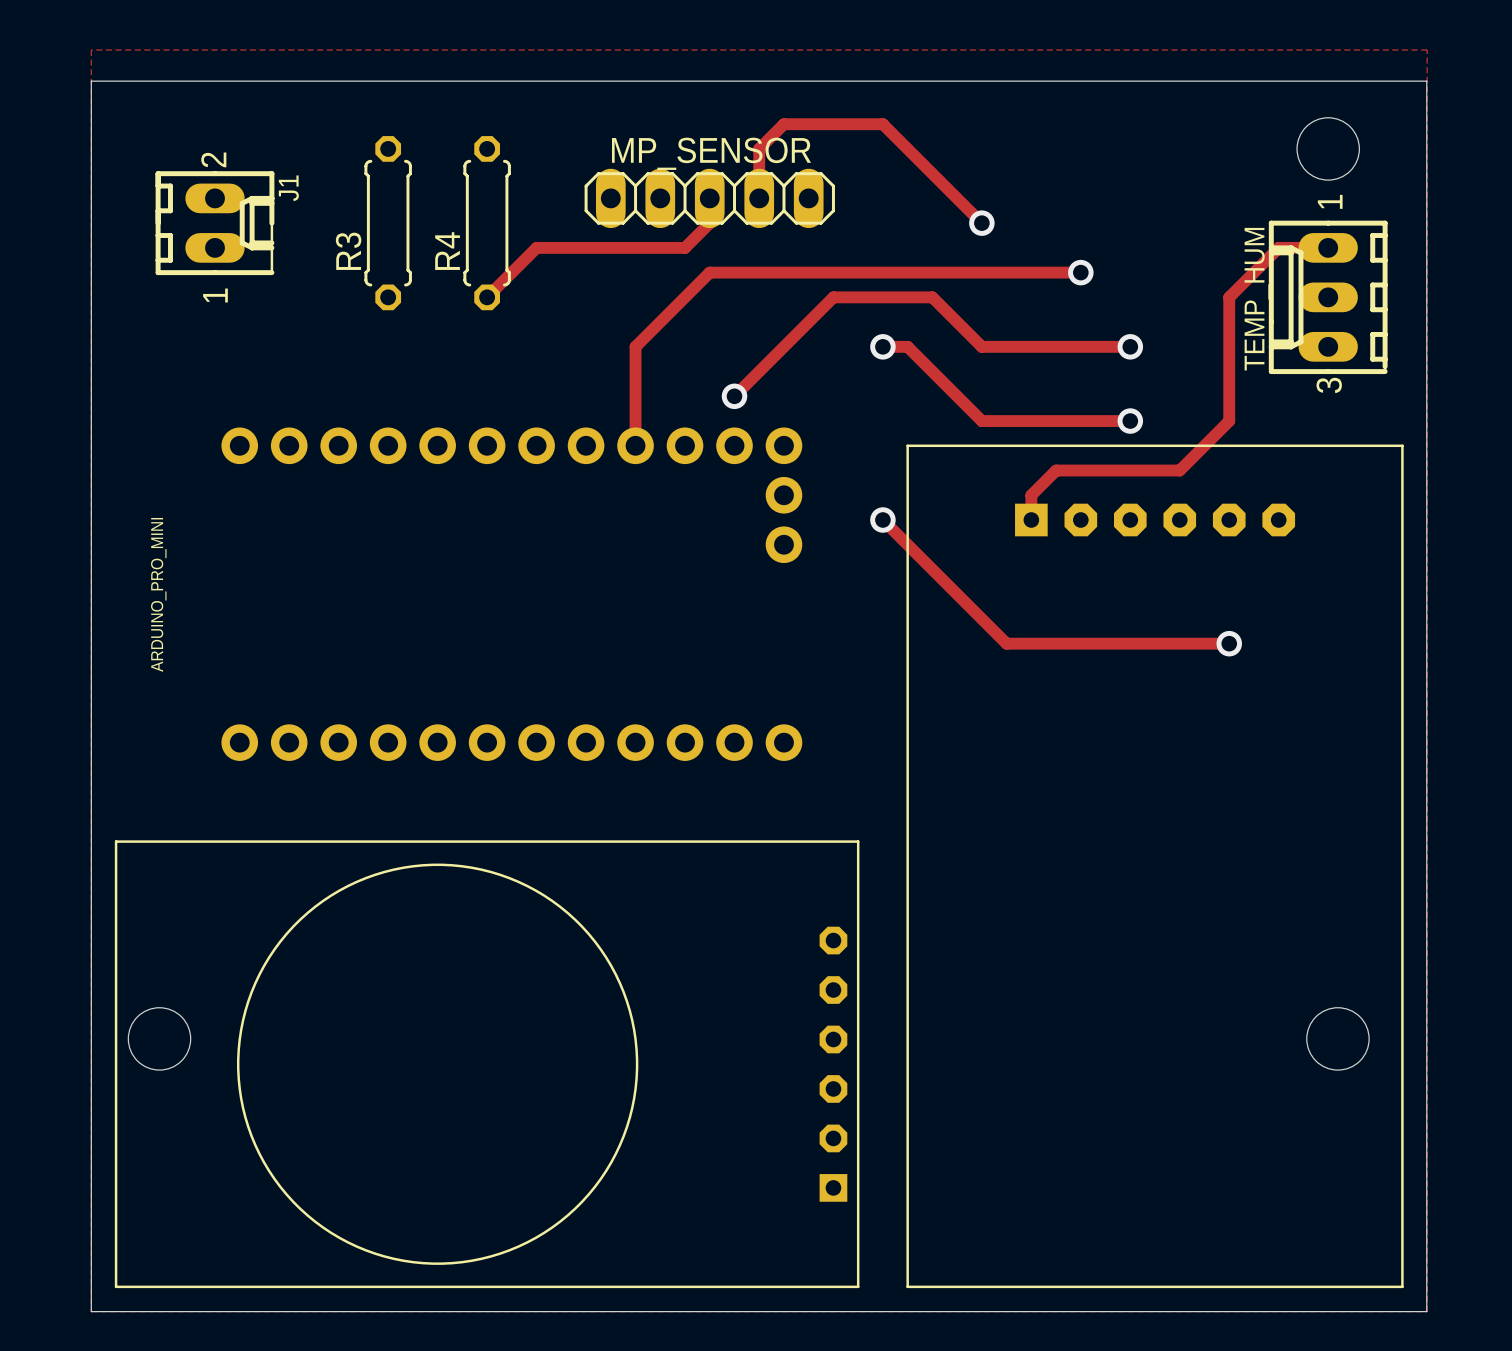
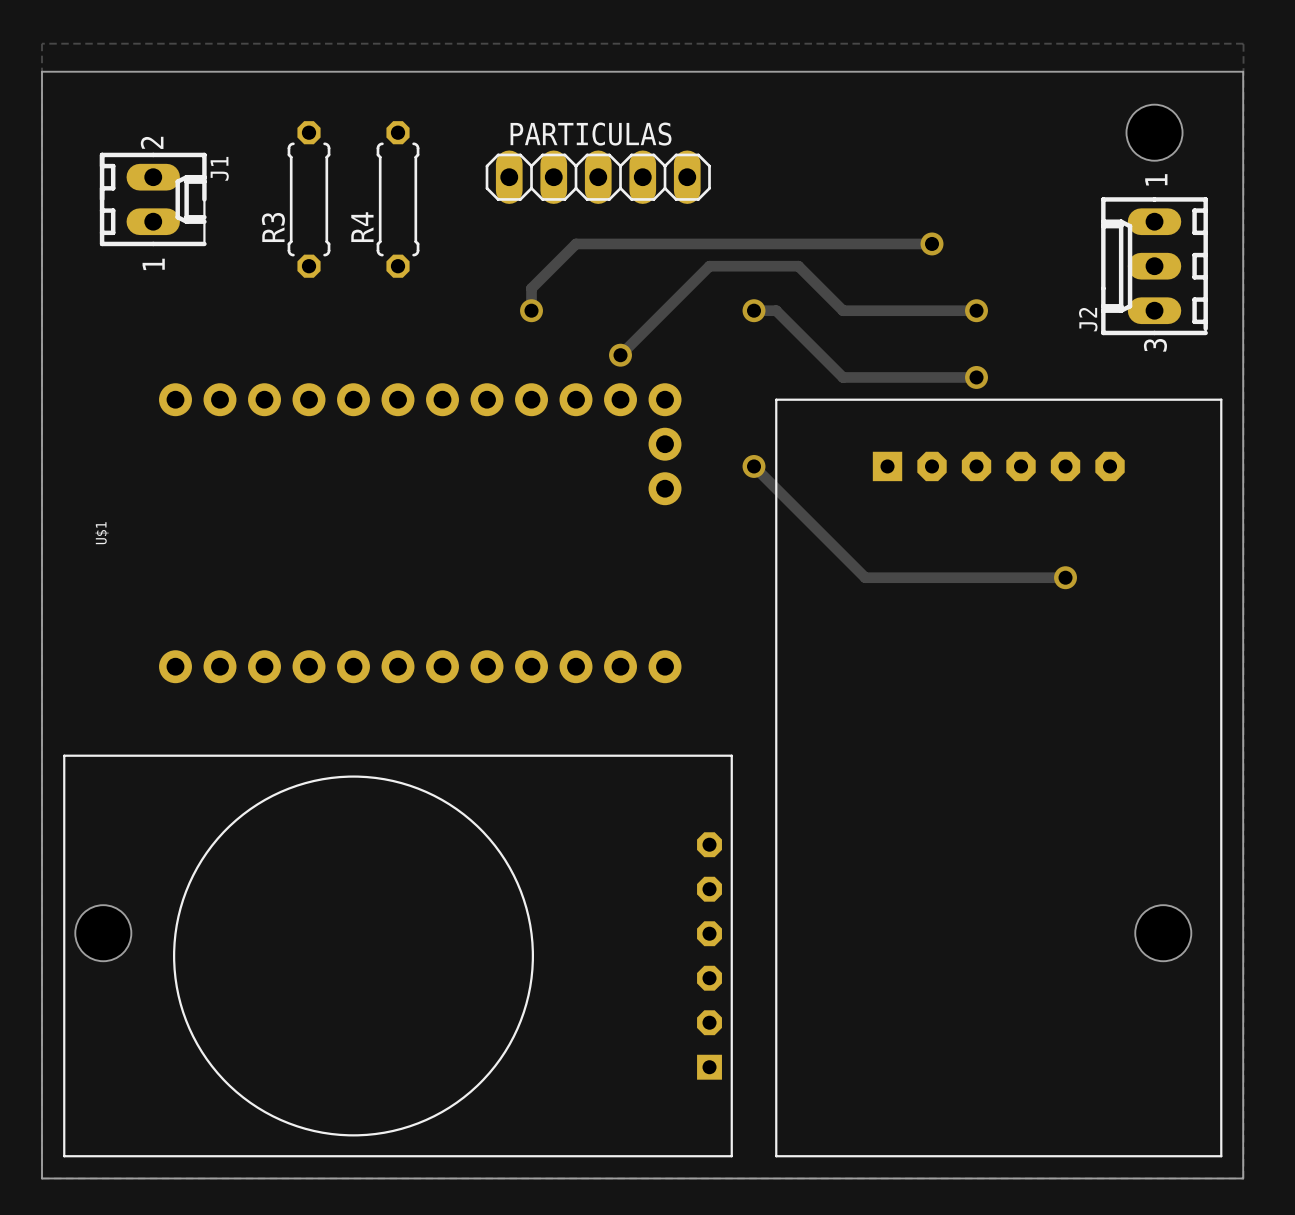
MP_SENSOR name: MP_SENSOR (711, 153) -> PARTICULAS (591, 134)
track: (709, 198) (709, 223) (685, 247) (536, 247) (487, 297) -> none
track: (759, 198) (759, 148) (783, 124) (882, 124) (981, 223) -> none
via: (981, 223) -> none
track: (1328, 247) (1278, 247) (1229, 297) (1229, 421) (1179, 470) (1056, 470) (1031, 495) (1031, 520) -> none
track: (709, 272) (635, 346) (635, 445) -> (598, 243) (576, 243) (531, 288) (531, 310)
TEMP_HUM name: TEMP_HUM (1257, 299) -> J2 (1088, 319)
via: none -> (531, 310)
ARDUINO_PRO_MINI name: ARDUINO_PRO_MINI (158, 594) -> U$1 (102, 533)

